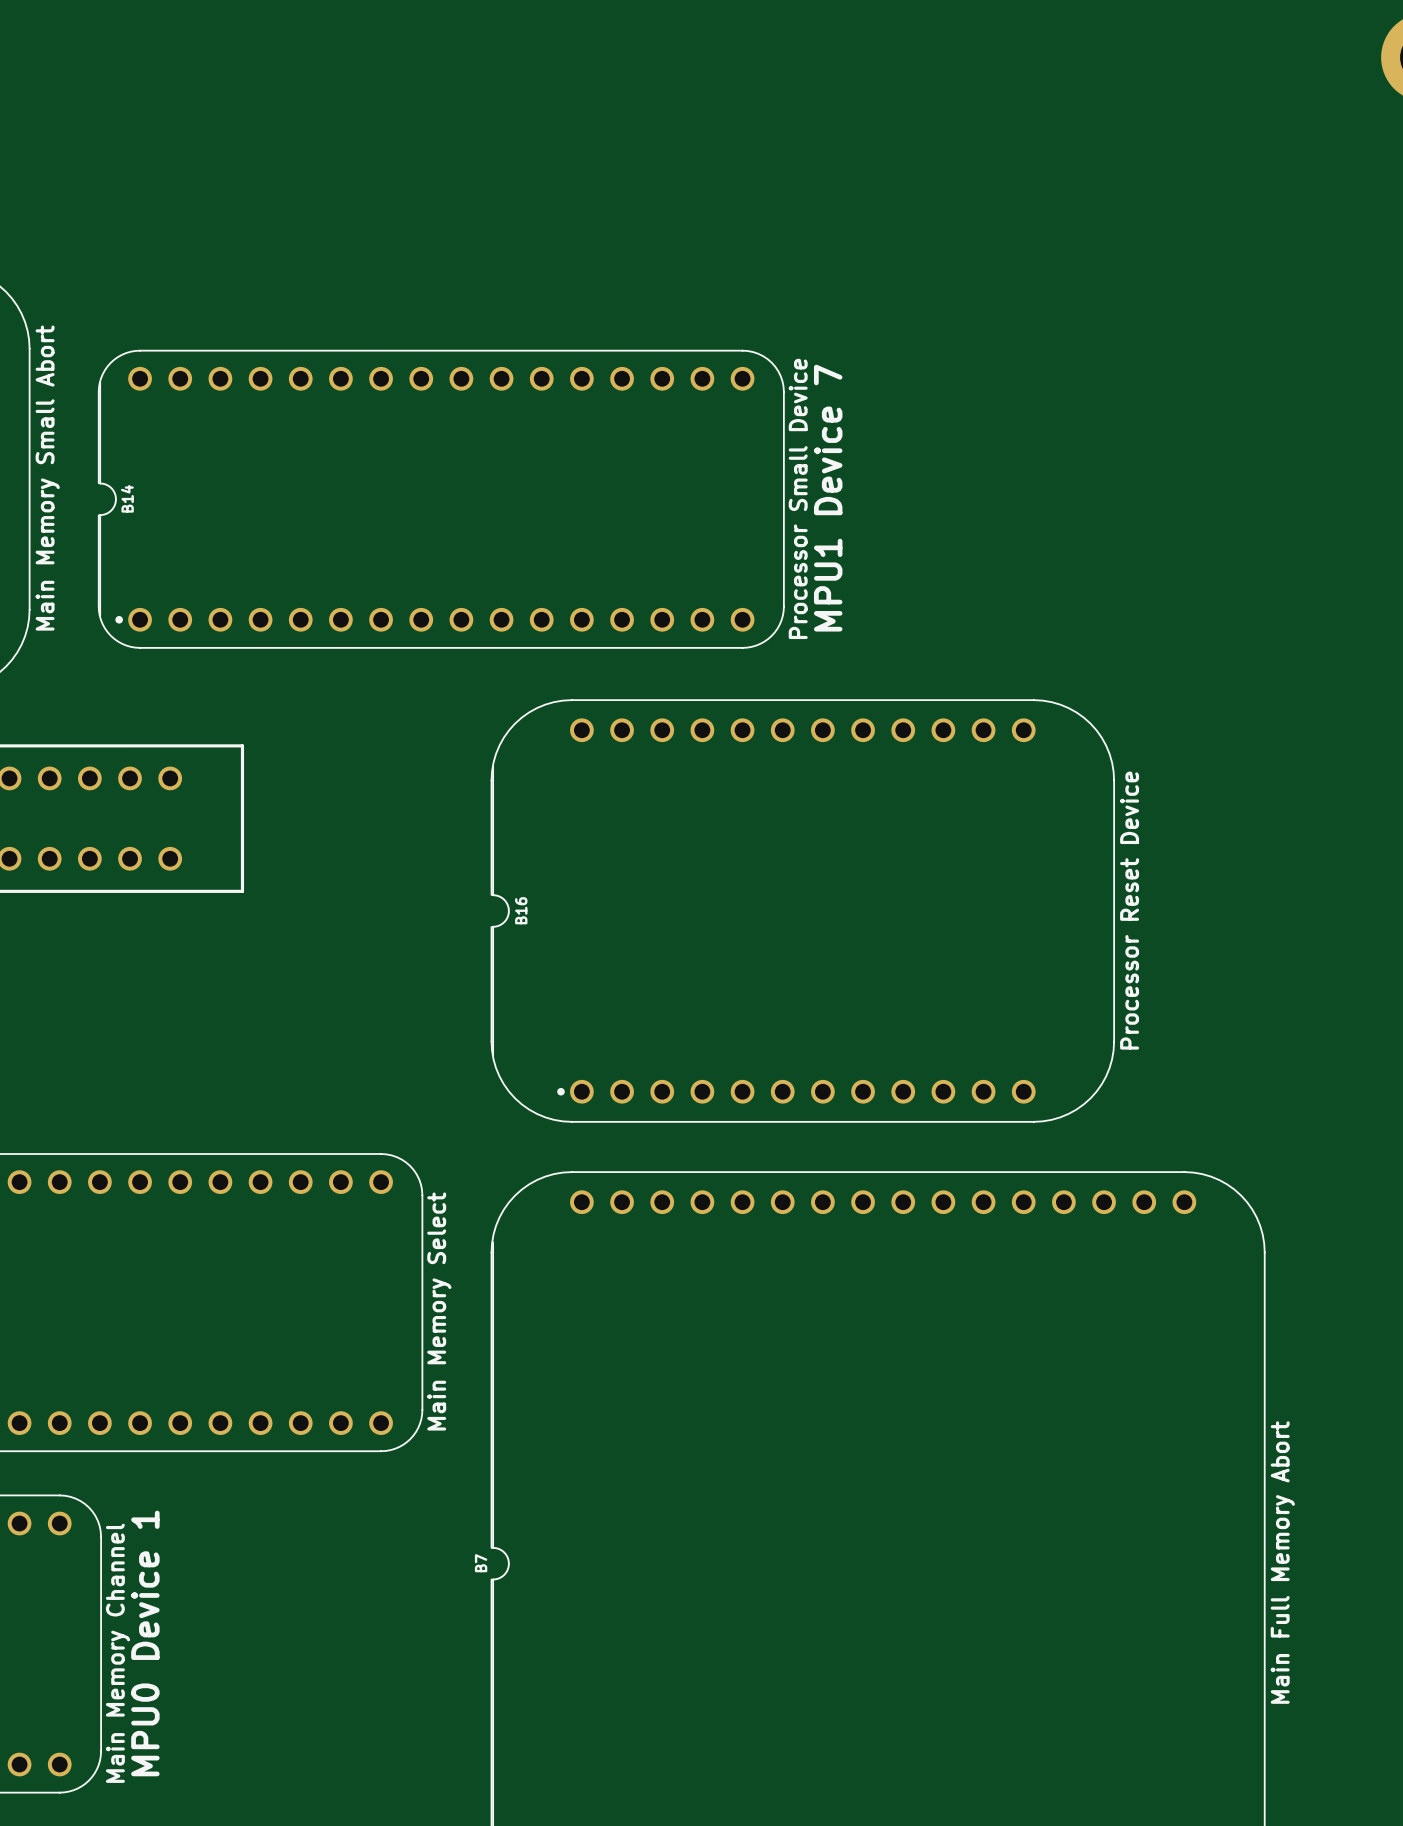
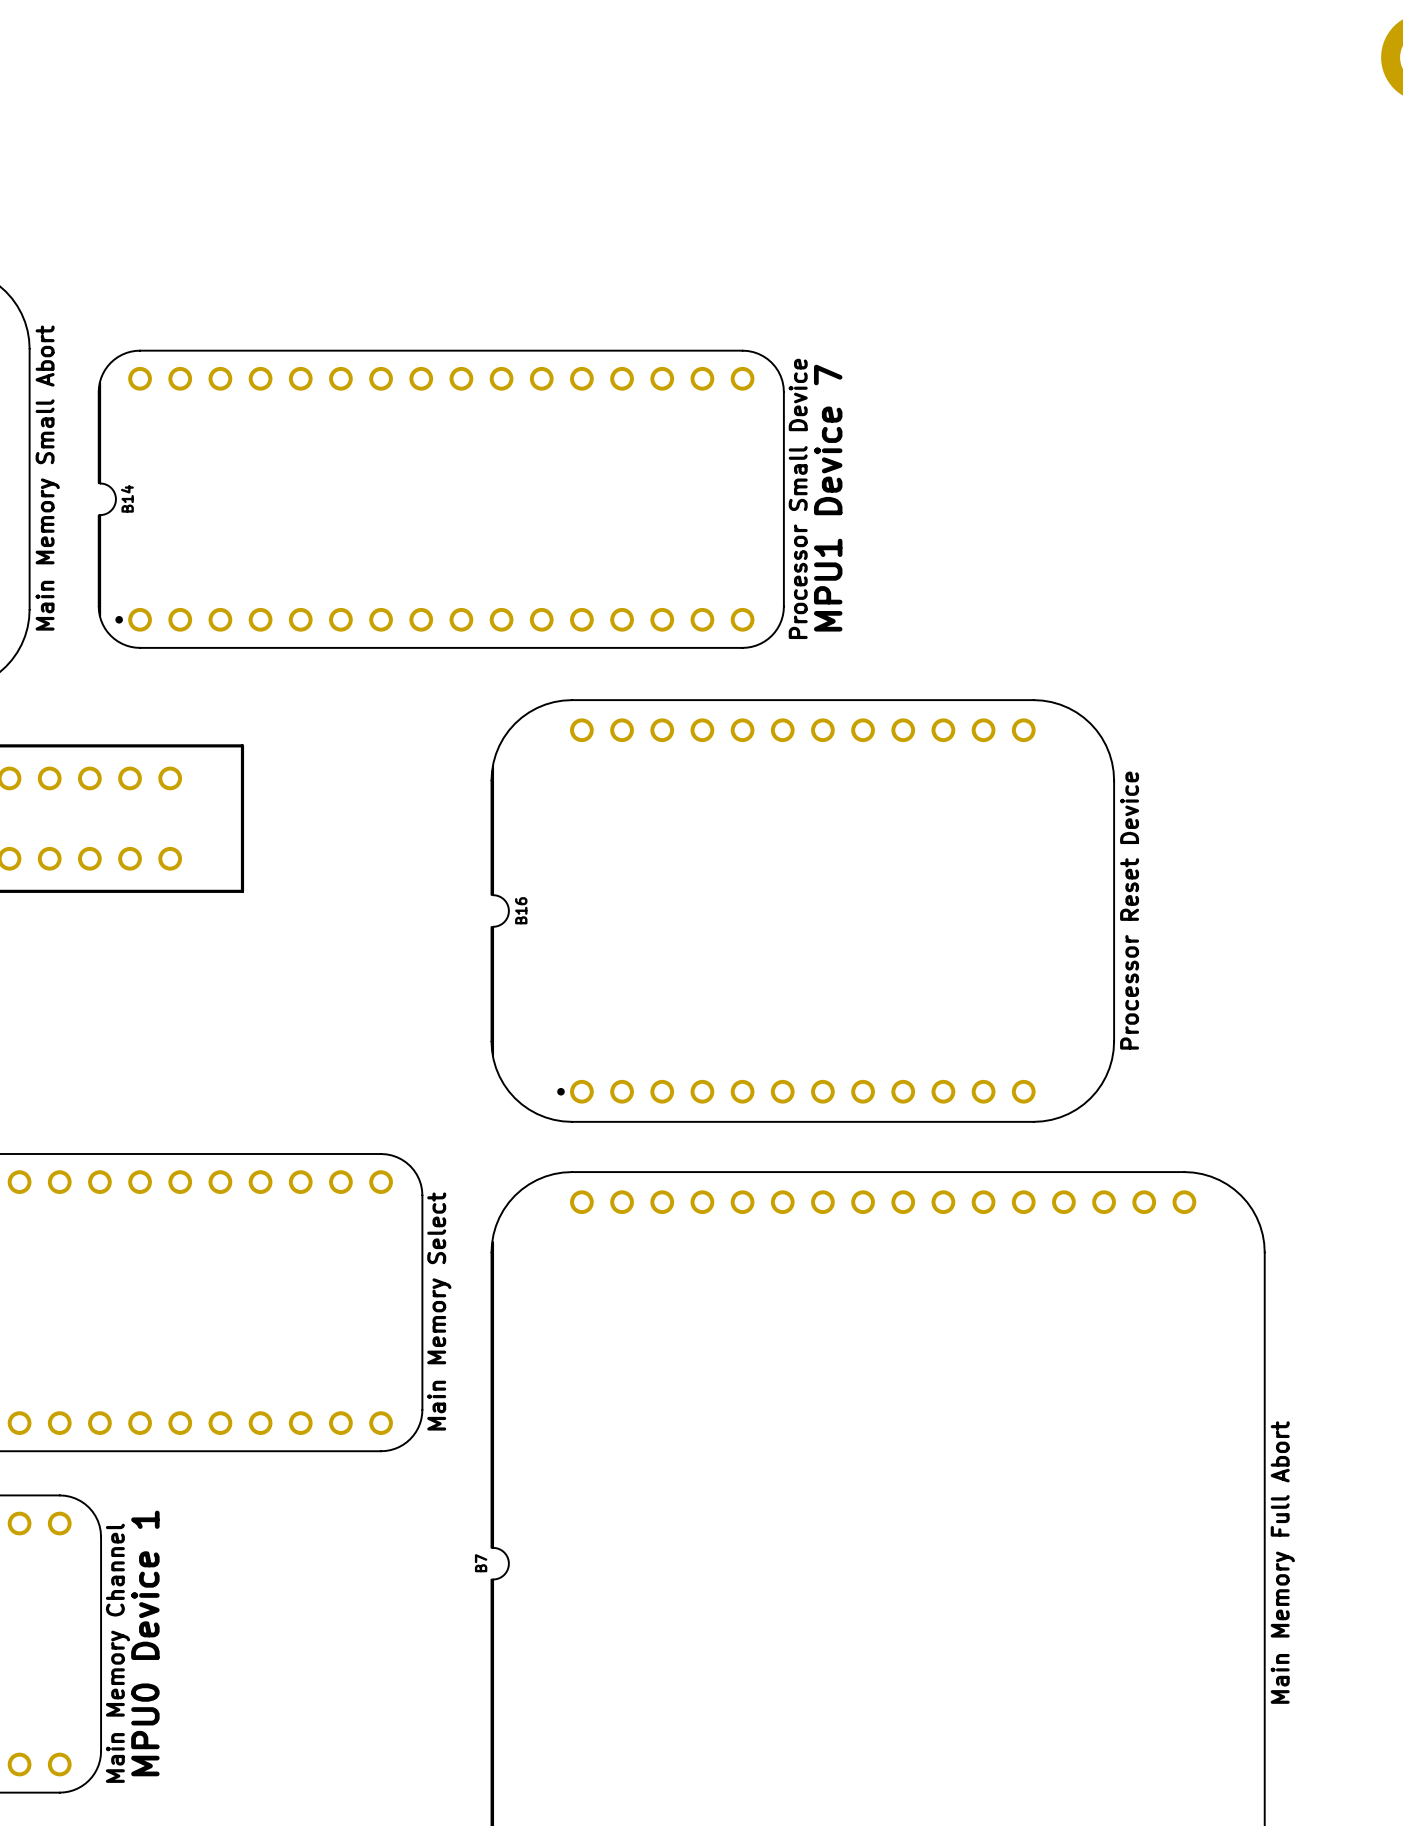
B7 text: Main Full Memory Abort (1282, 1562) -> Main Memory Full Abort (1282, 1562)

